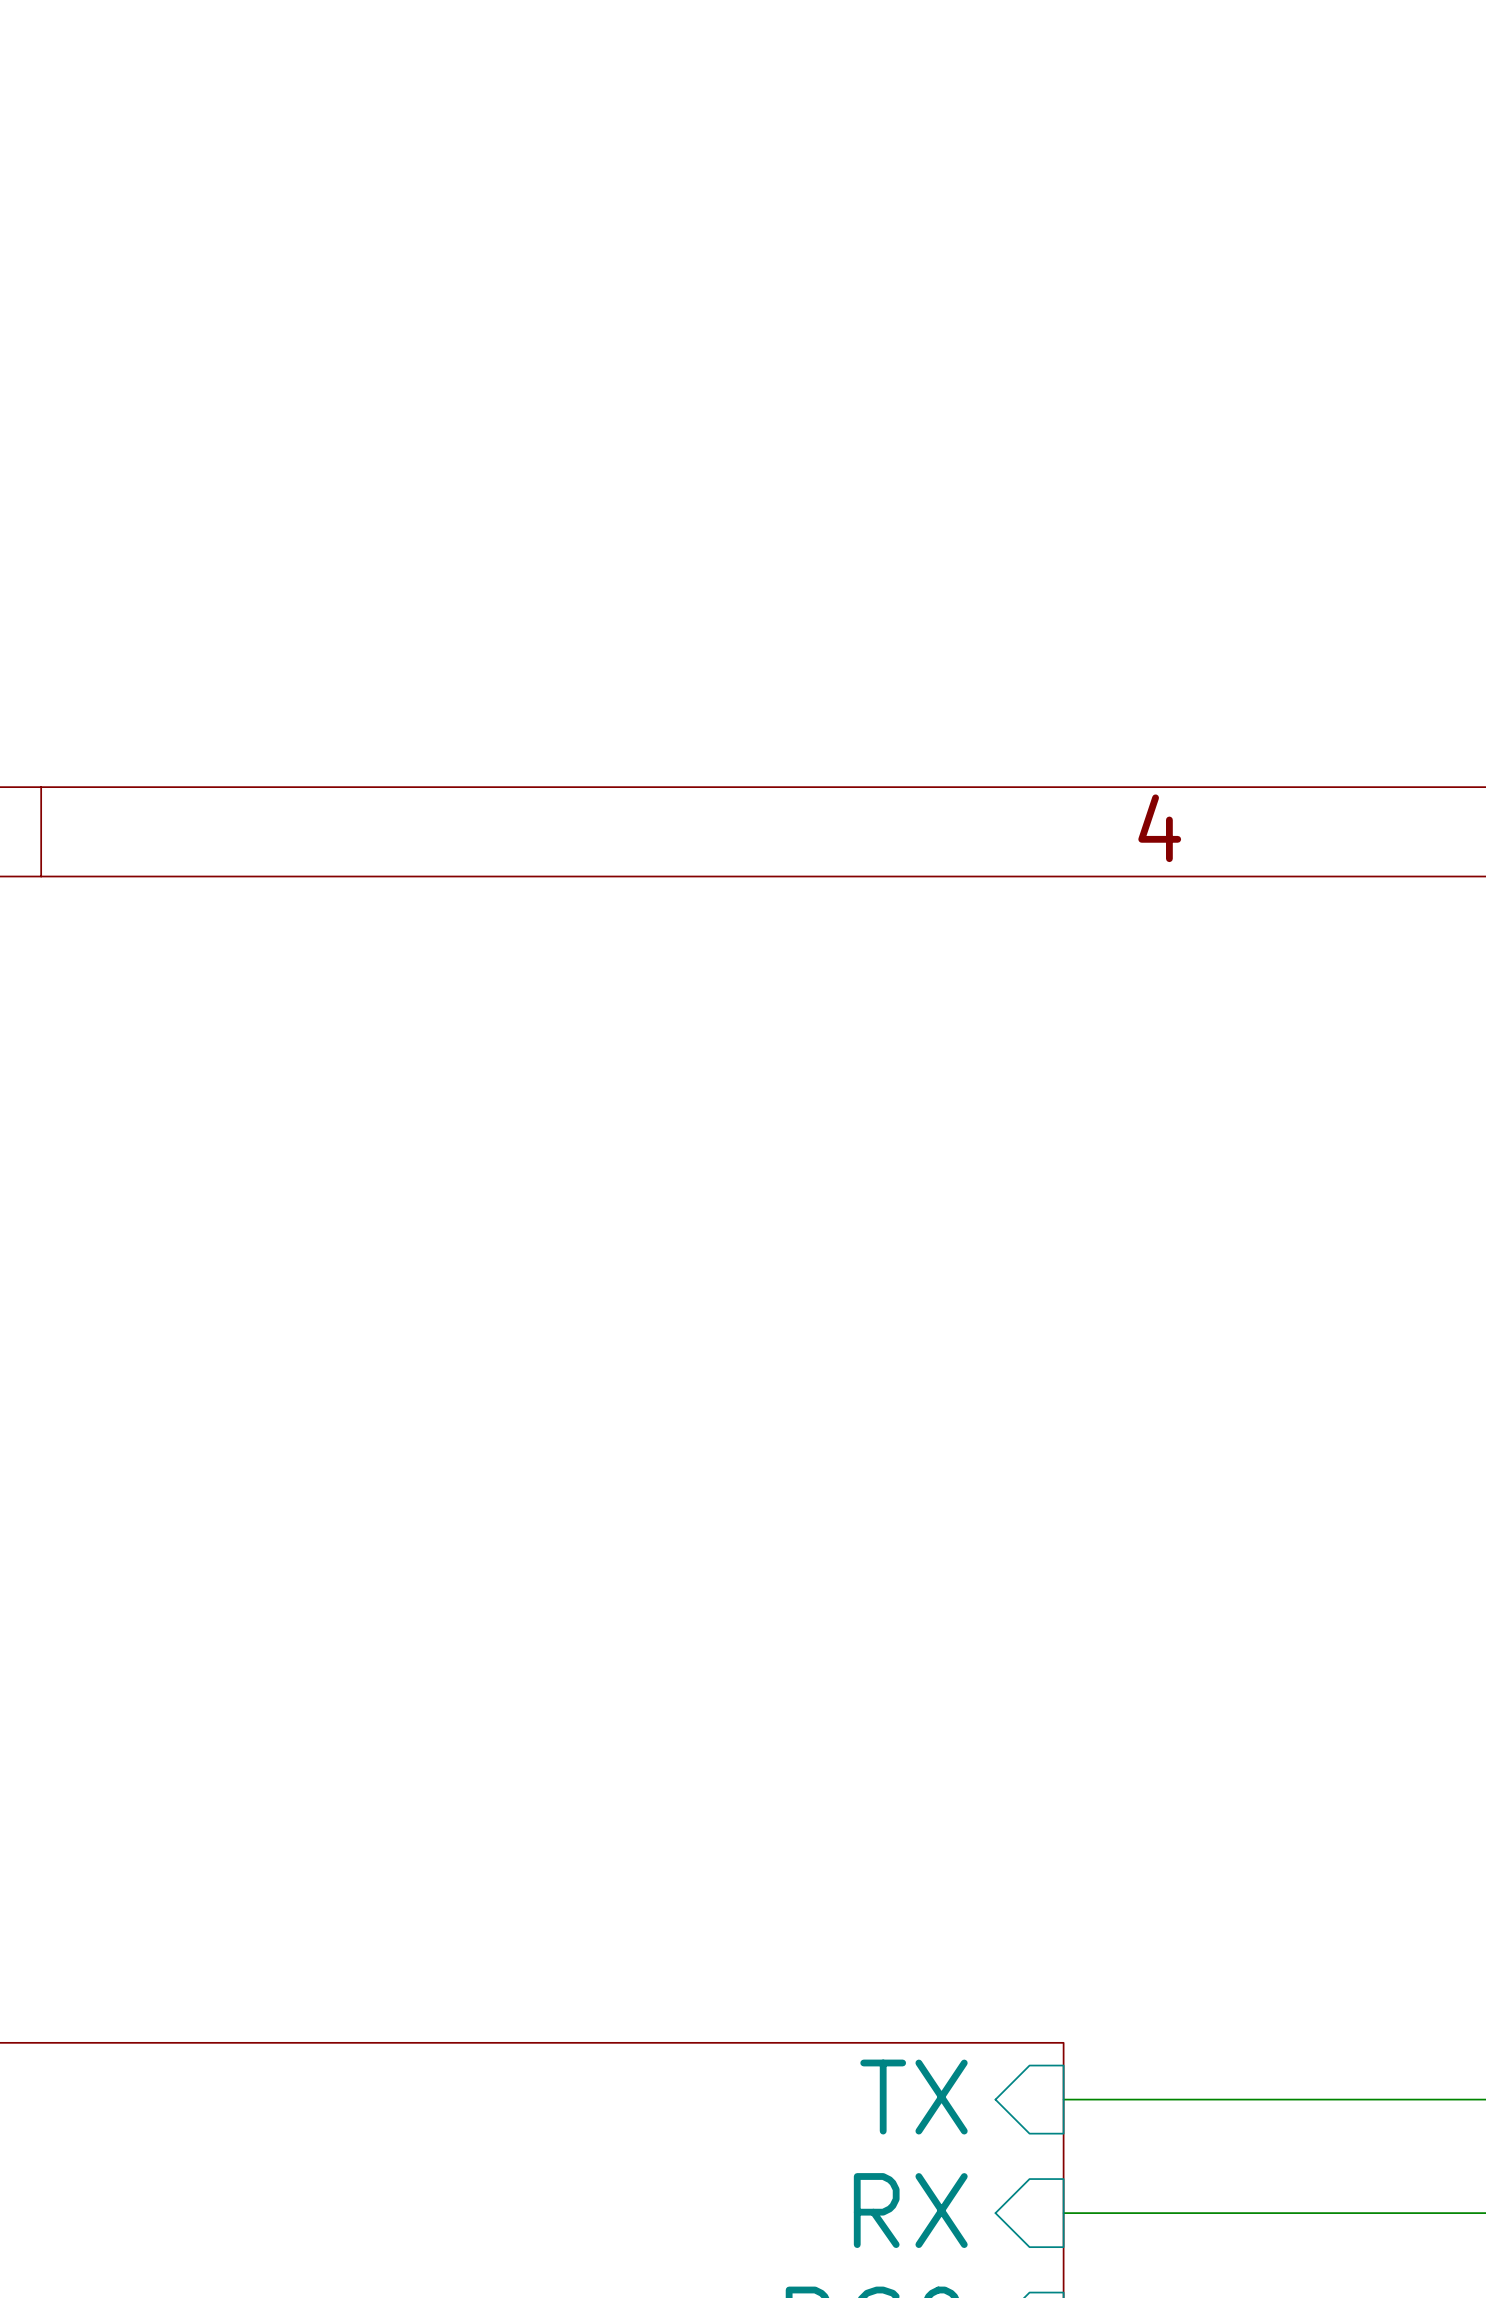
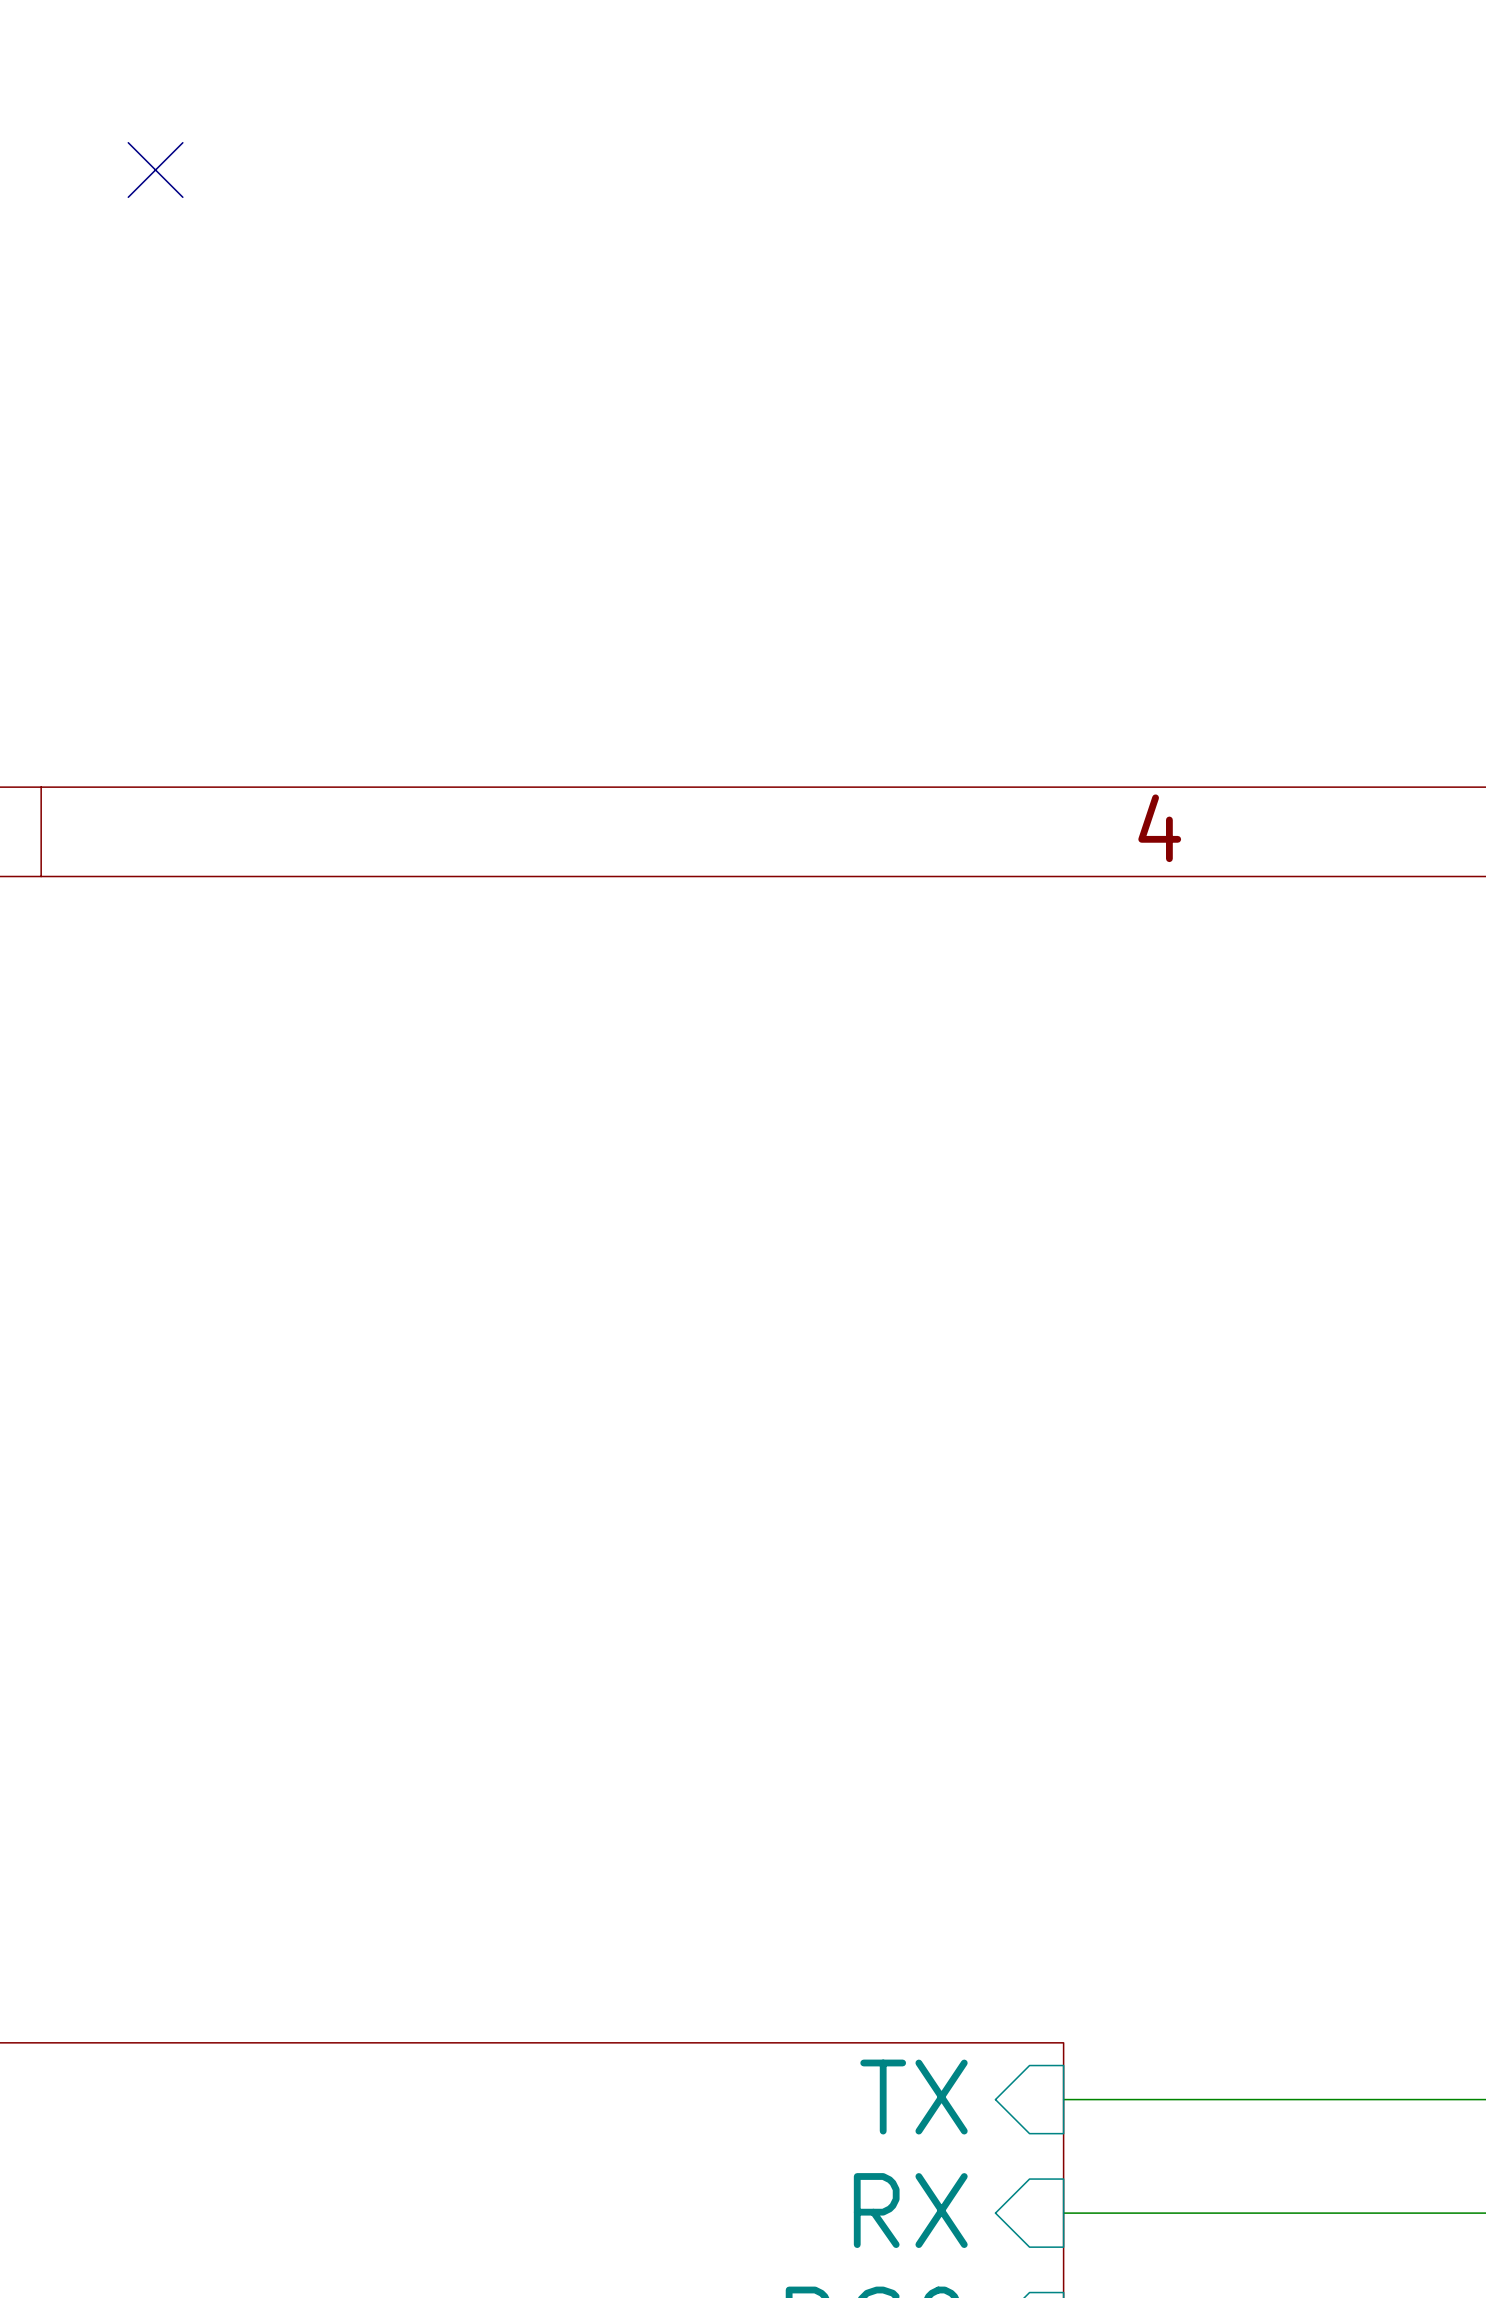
no-connect mark: none -> (155, 170)

